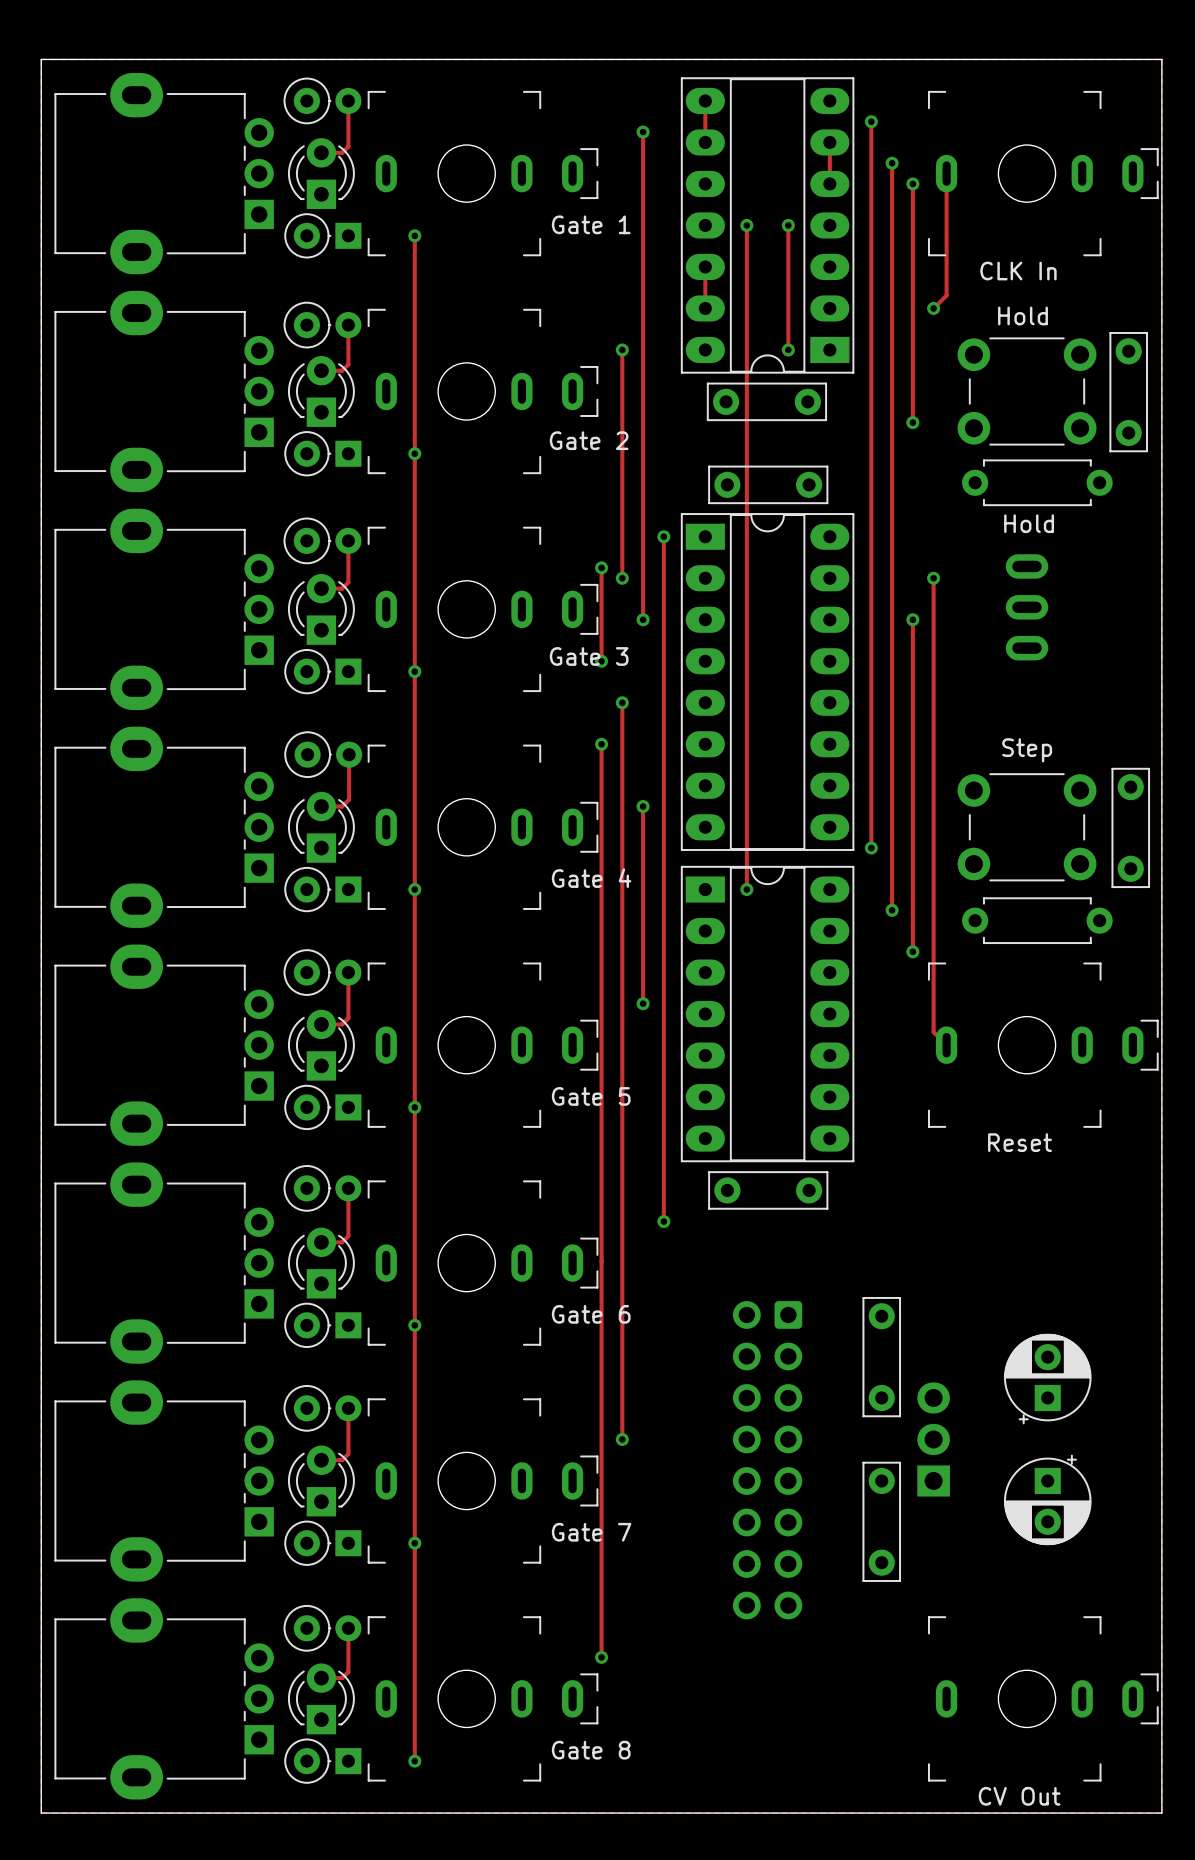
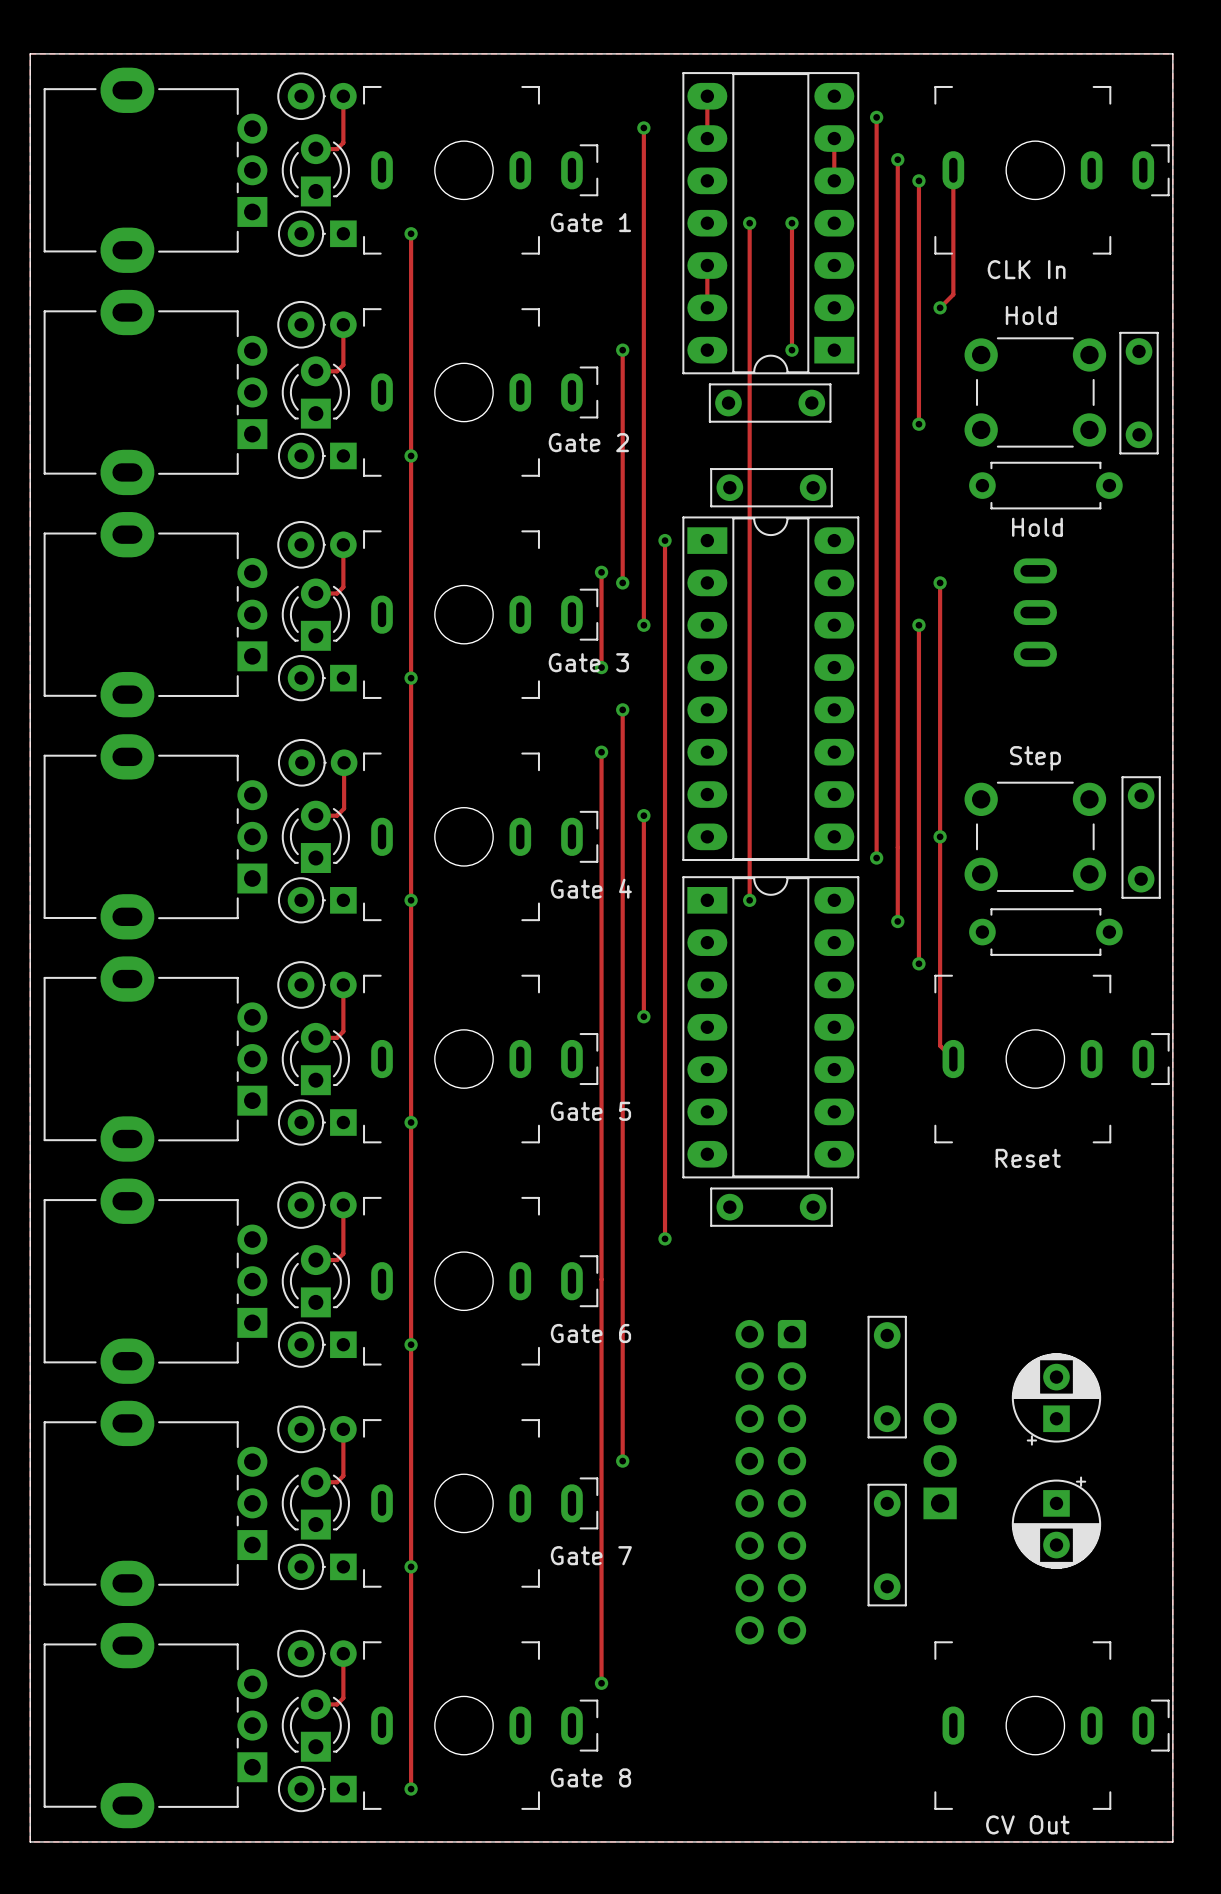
via: none -> (940, 836)

